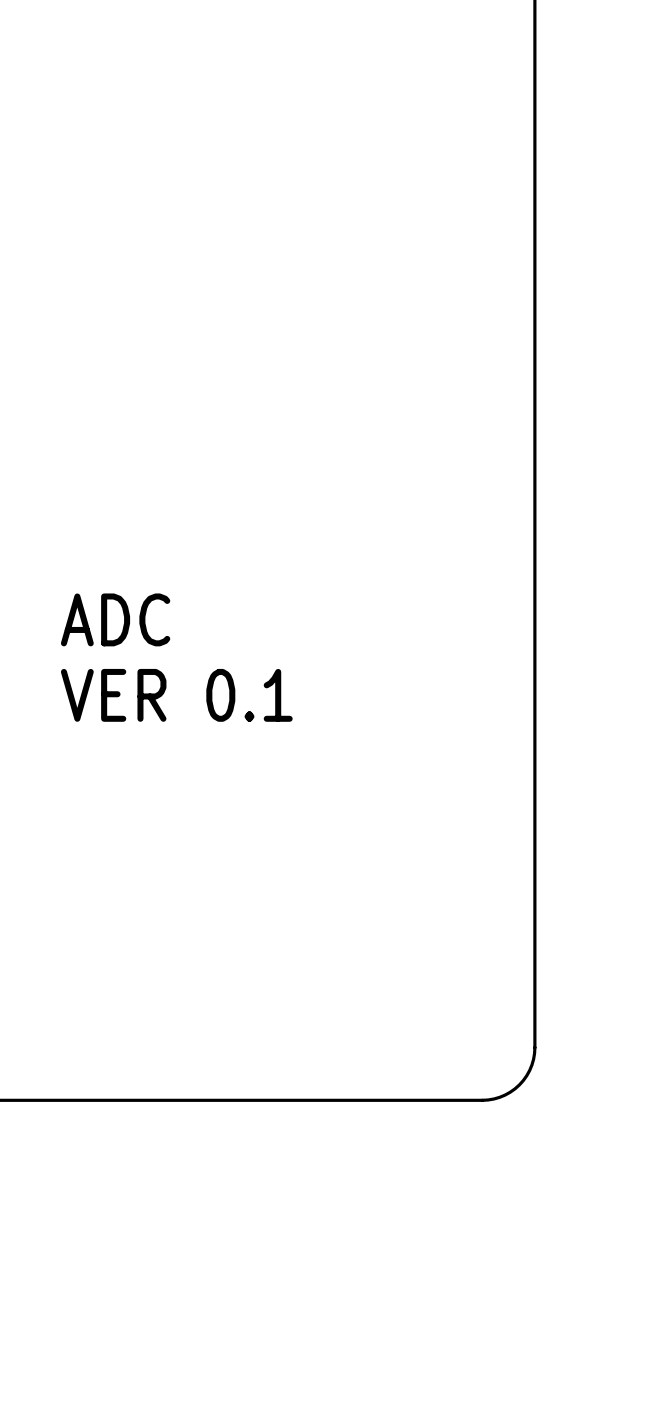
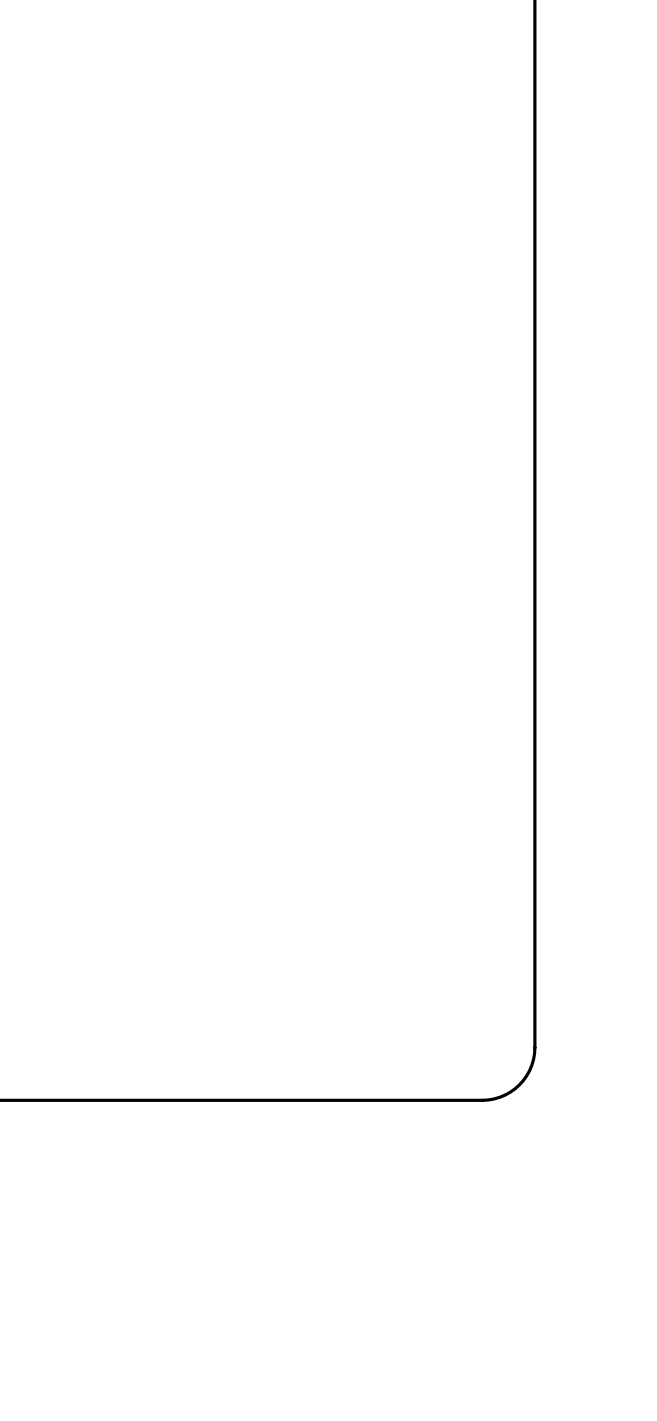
text: ADC (115, 619) -> none
text: VER 0.1 (176, 695) -> none

